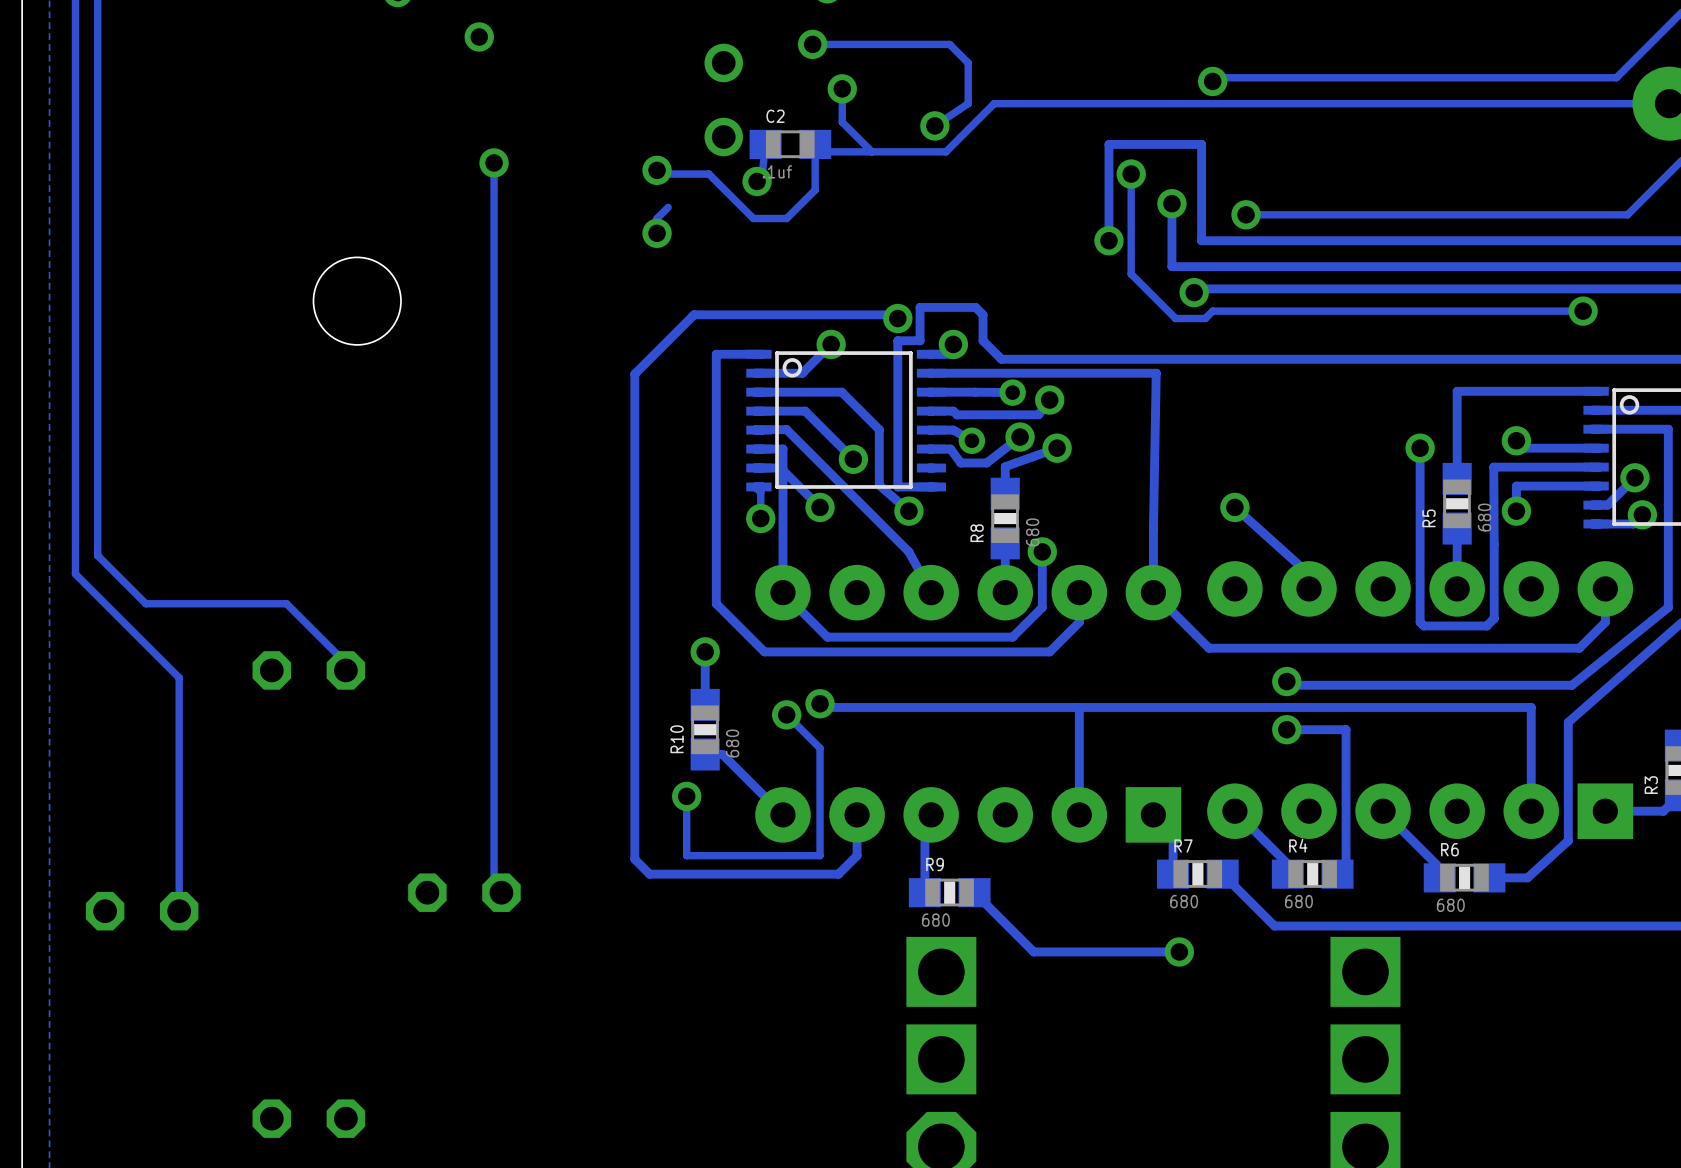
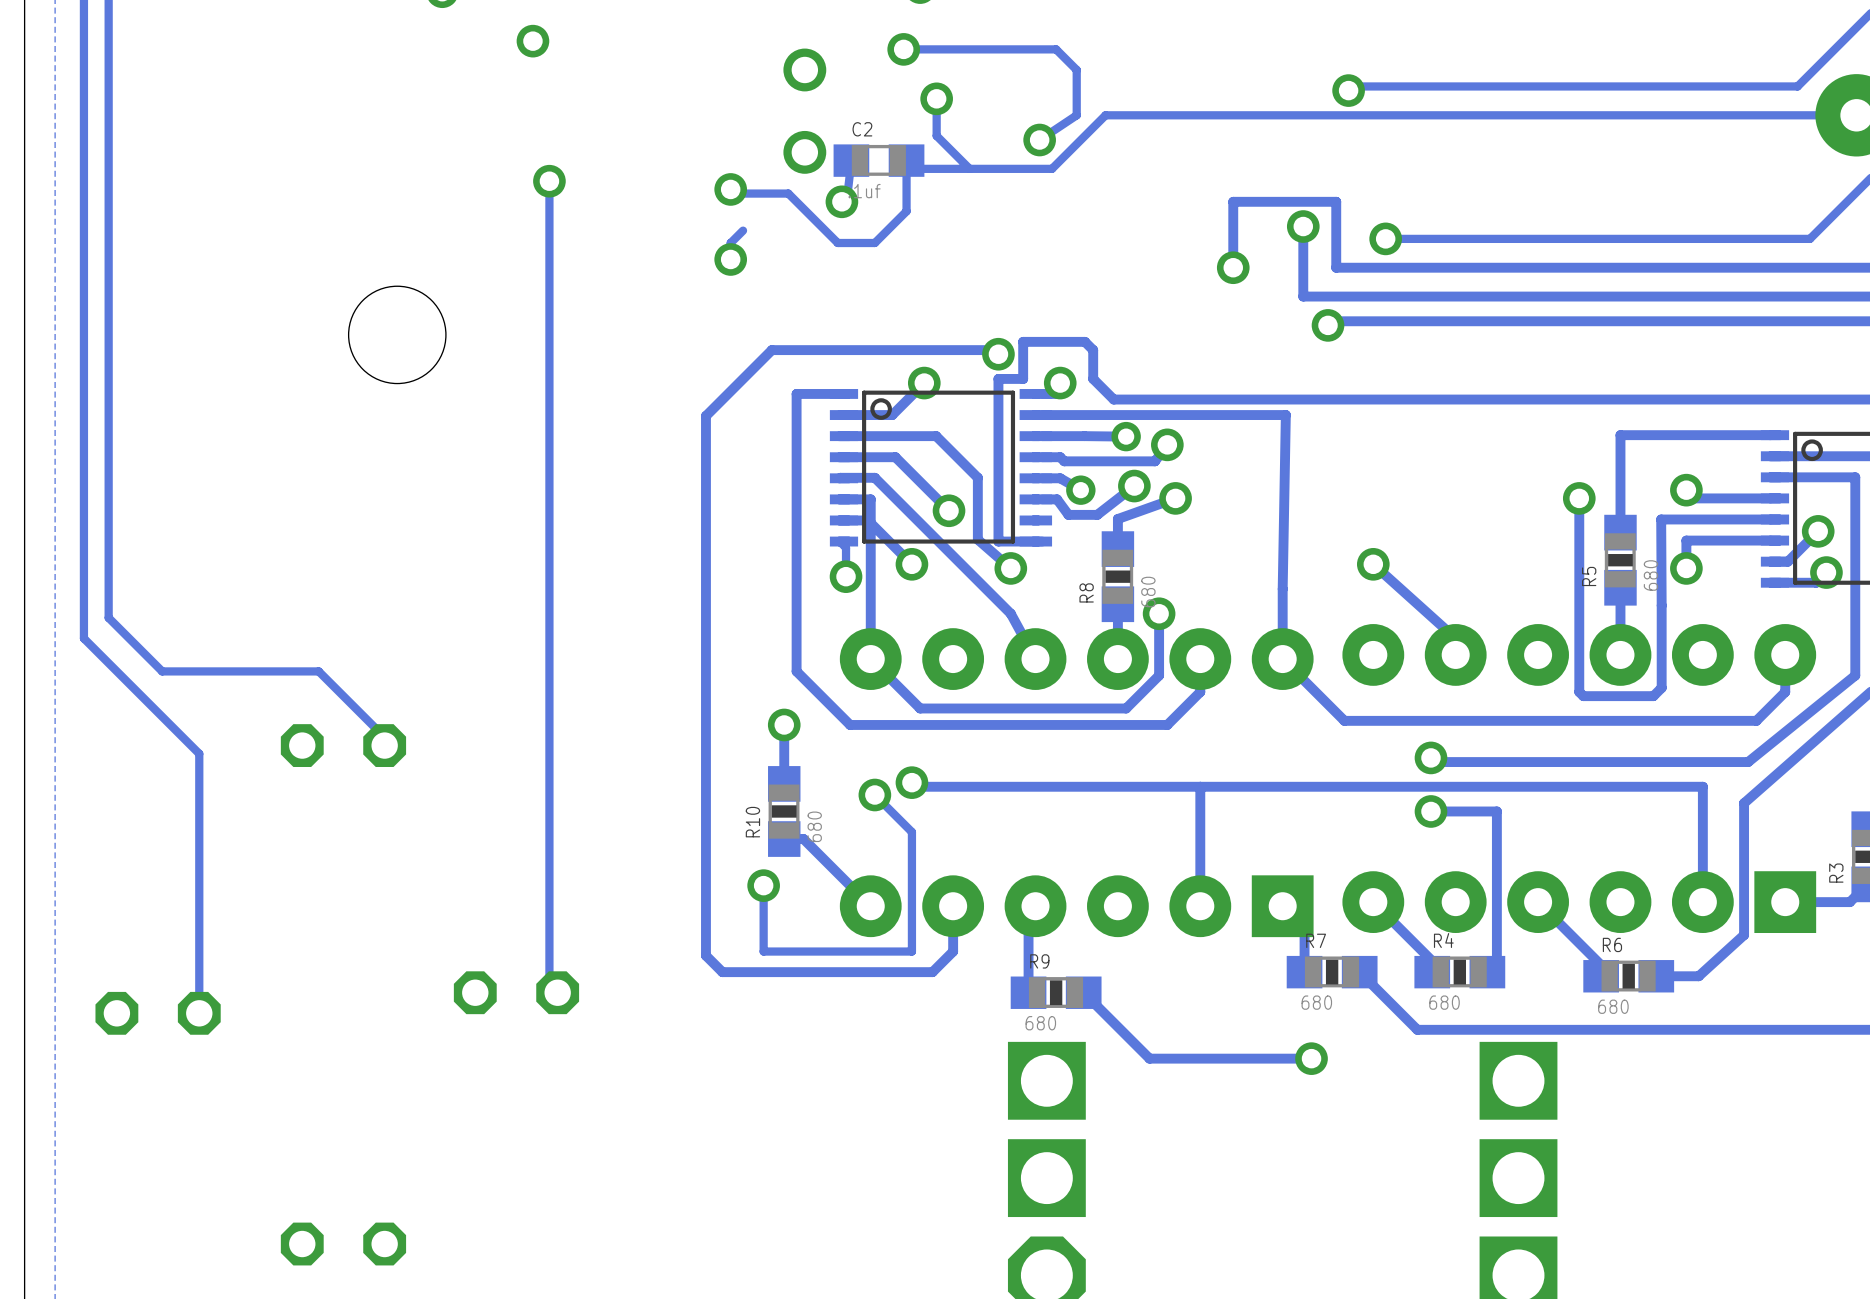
track: (1131, 174) (1131, 274) (1175, 318) (1205, 318) (1212, 311) (1583, 311) -> none
via: (1131, 174) -> none
track: (1201, 181) (1201, 144) (1108, 144) (1108, 181) -> (1336, 201) (1233, 201)
via: (1583, 311) -> none

